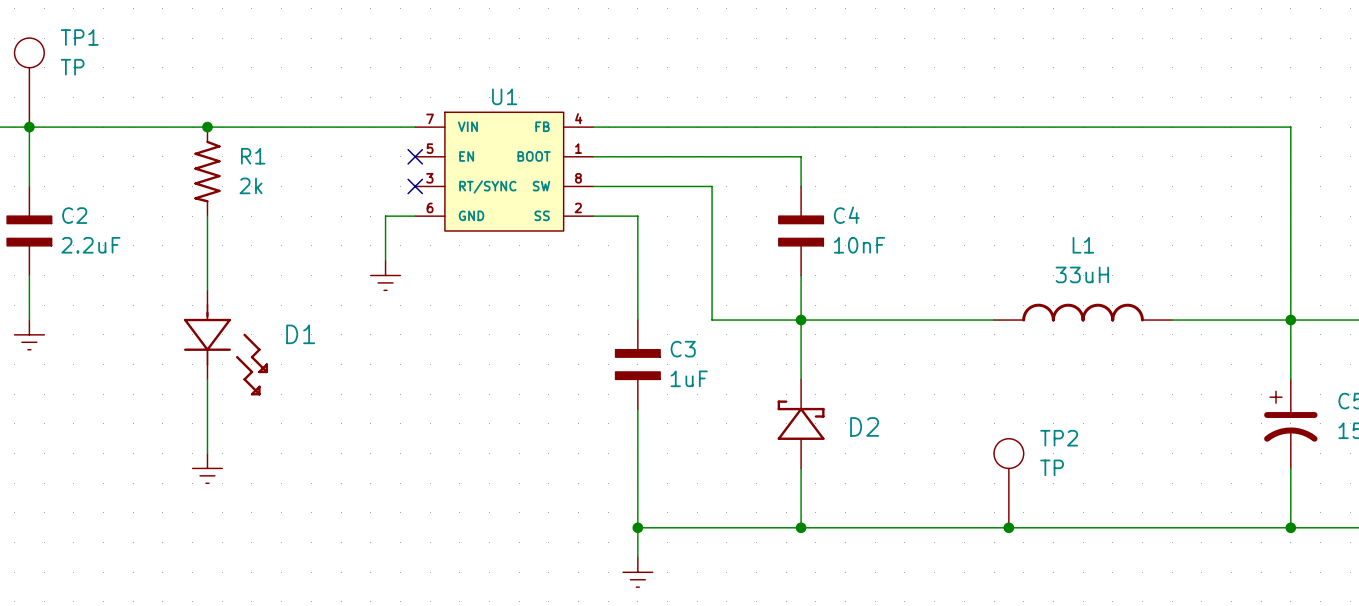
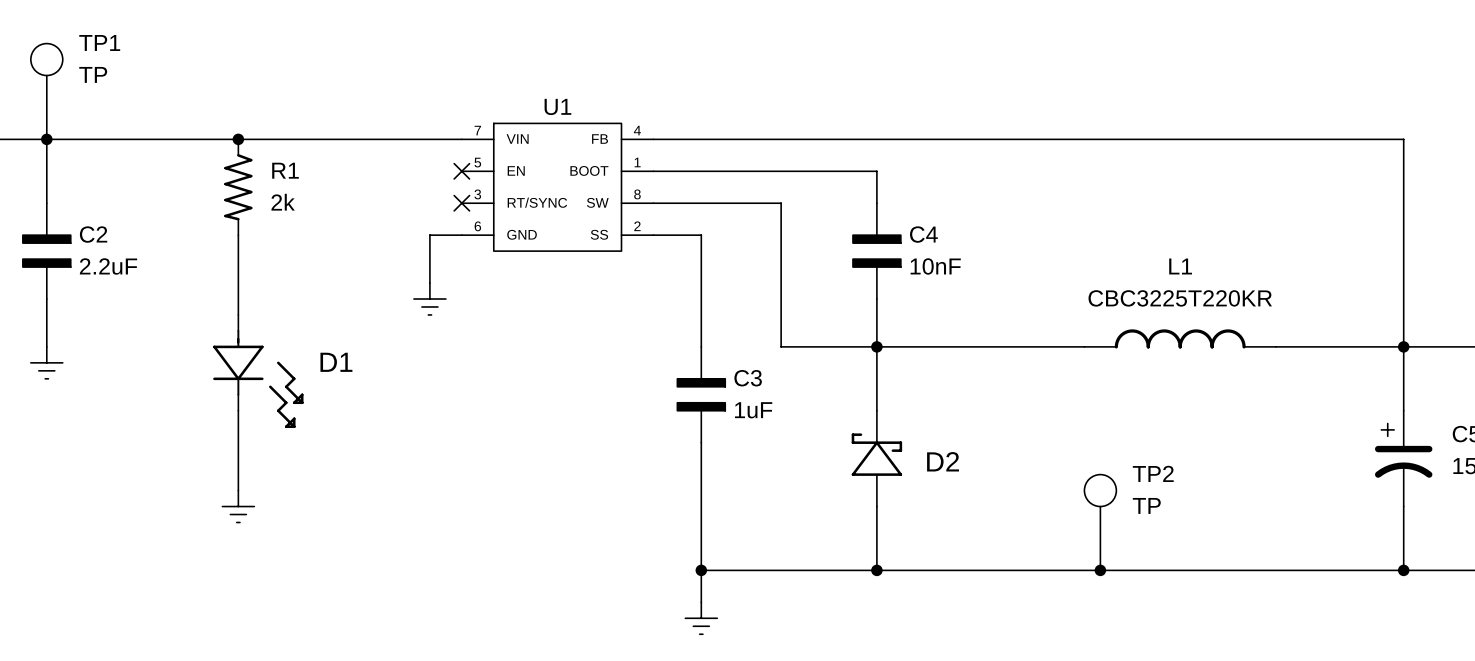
L1 value: 33uH (1082, 274) -> CBC3225T220KR (1180, 298)

